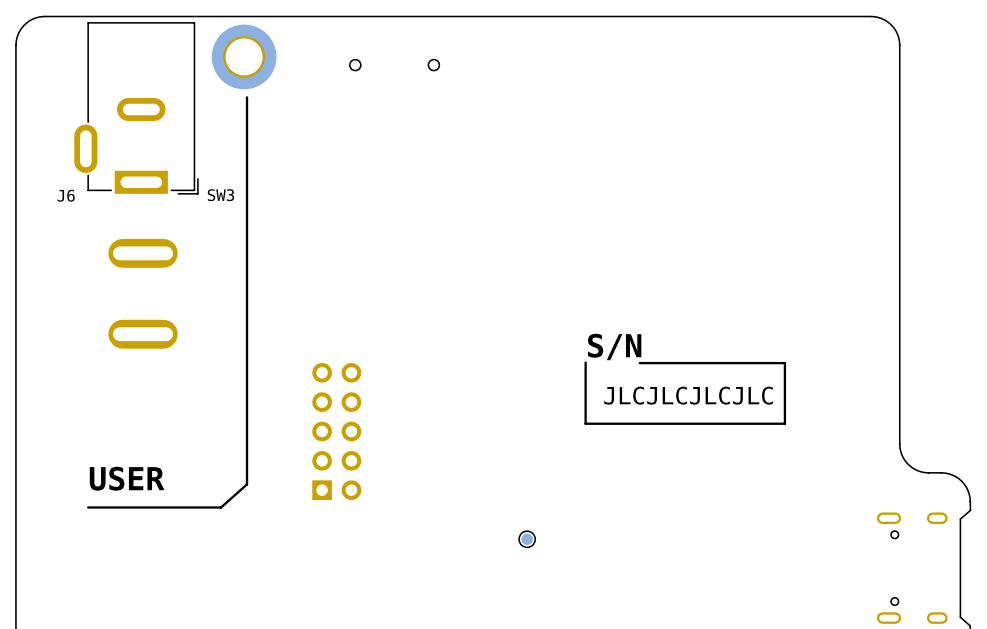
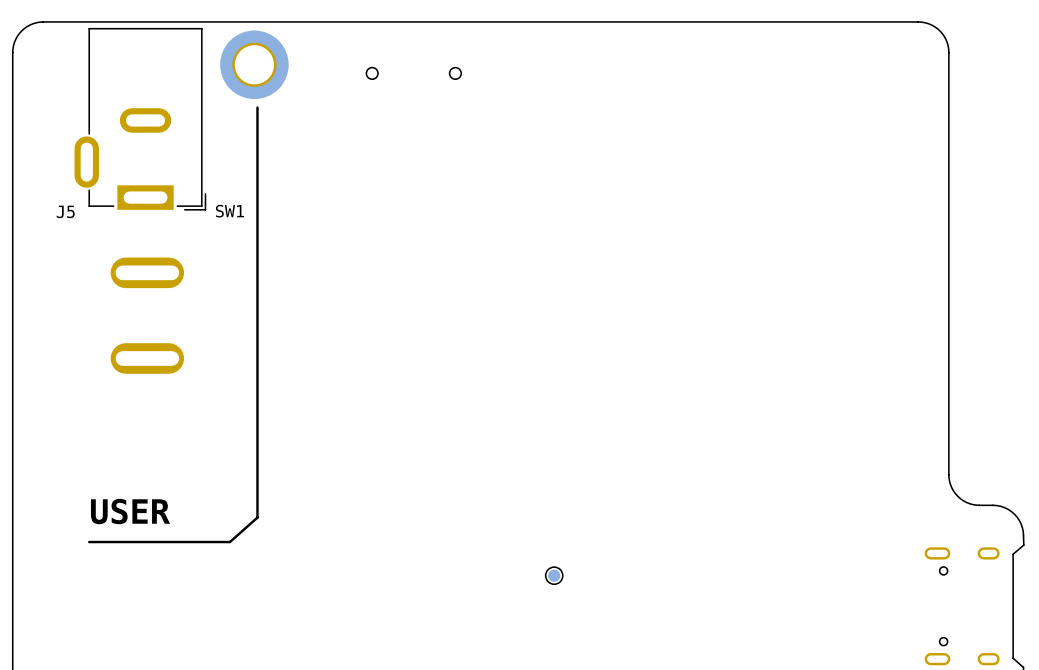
J6 name: J6 (66, 195) -> J5 (65, 211)
SW3 name: SW3 (220, 195) -> SW1 (229, 211)
text: S/N (614, 346) -> none
line: (585, 362) (585, 423) (784, 423) (784, 363) (639, 363) -> none
text: JLCJLCJLCJLC (688, 395) -> none
part: (336, 431) -> none

